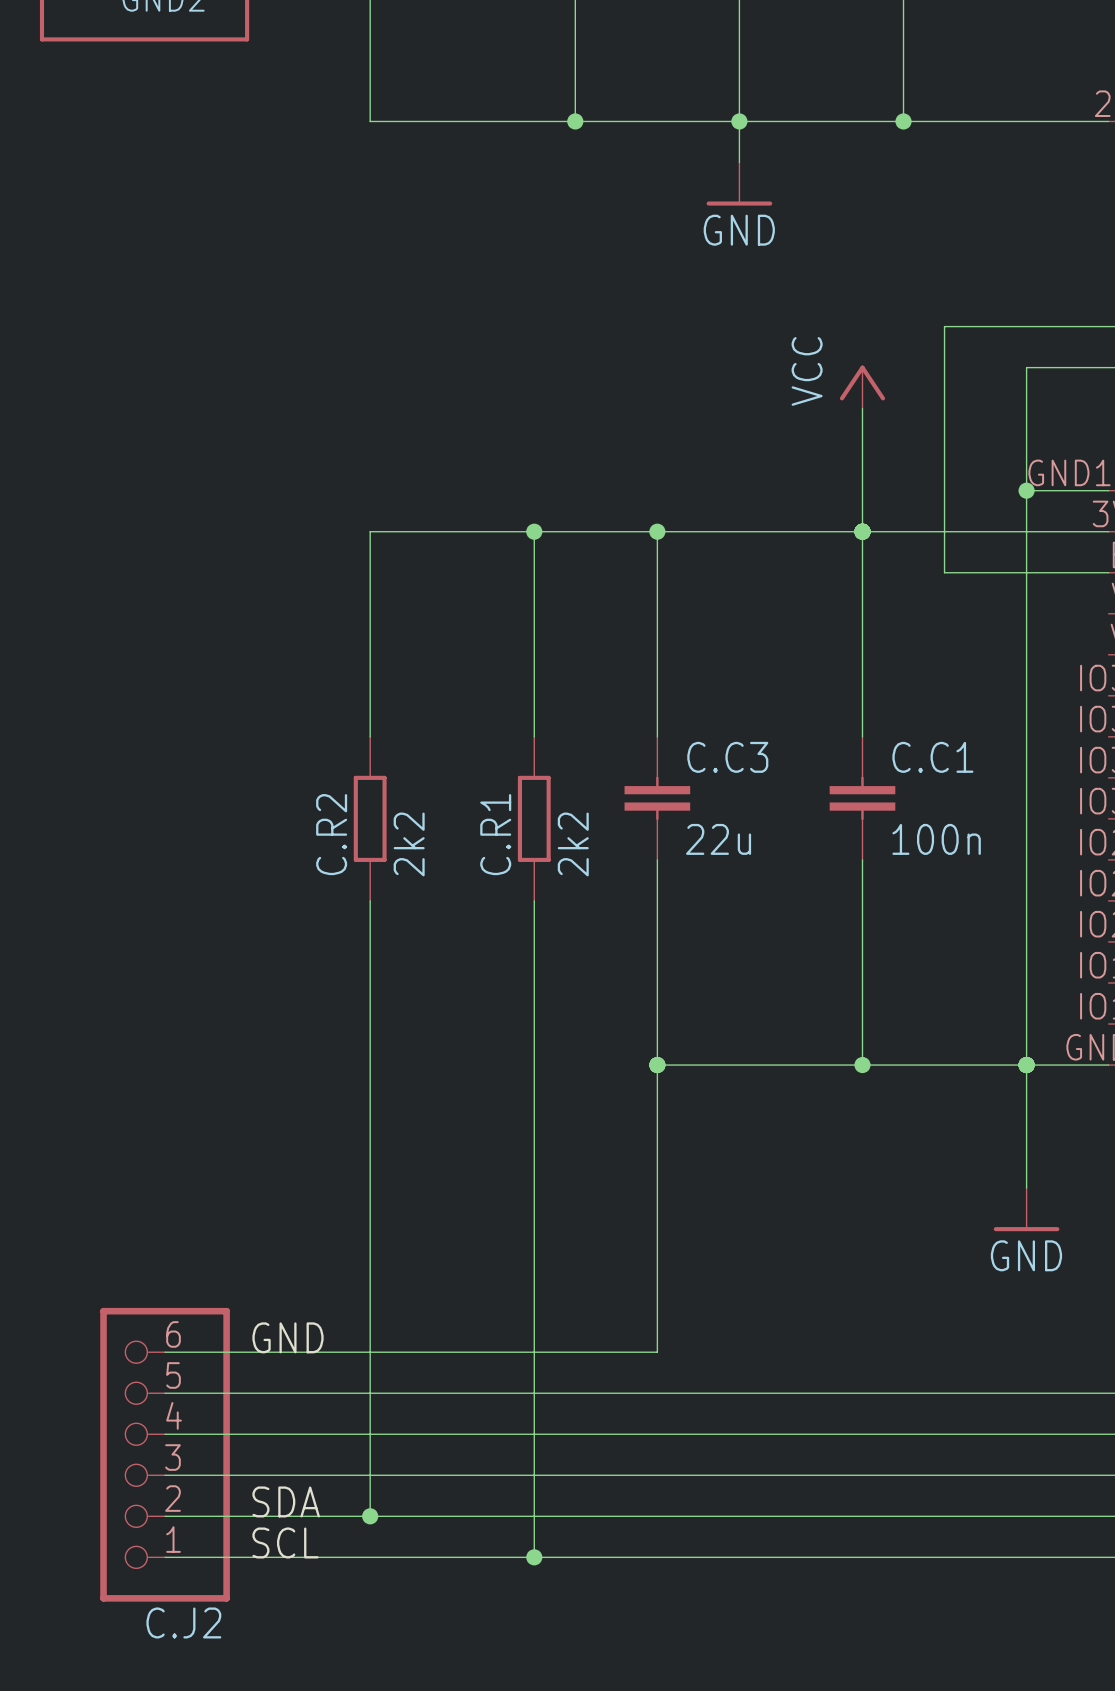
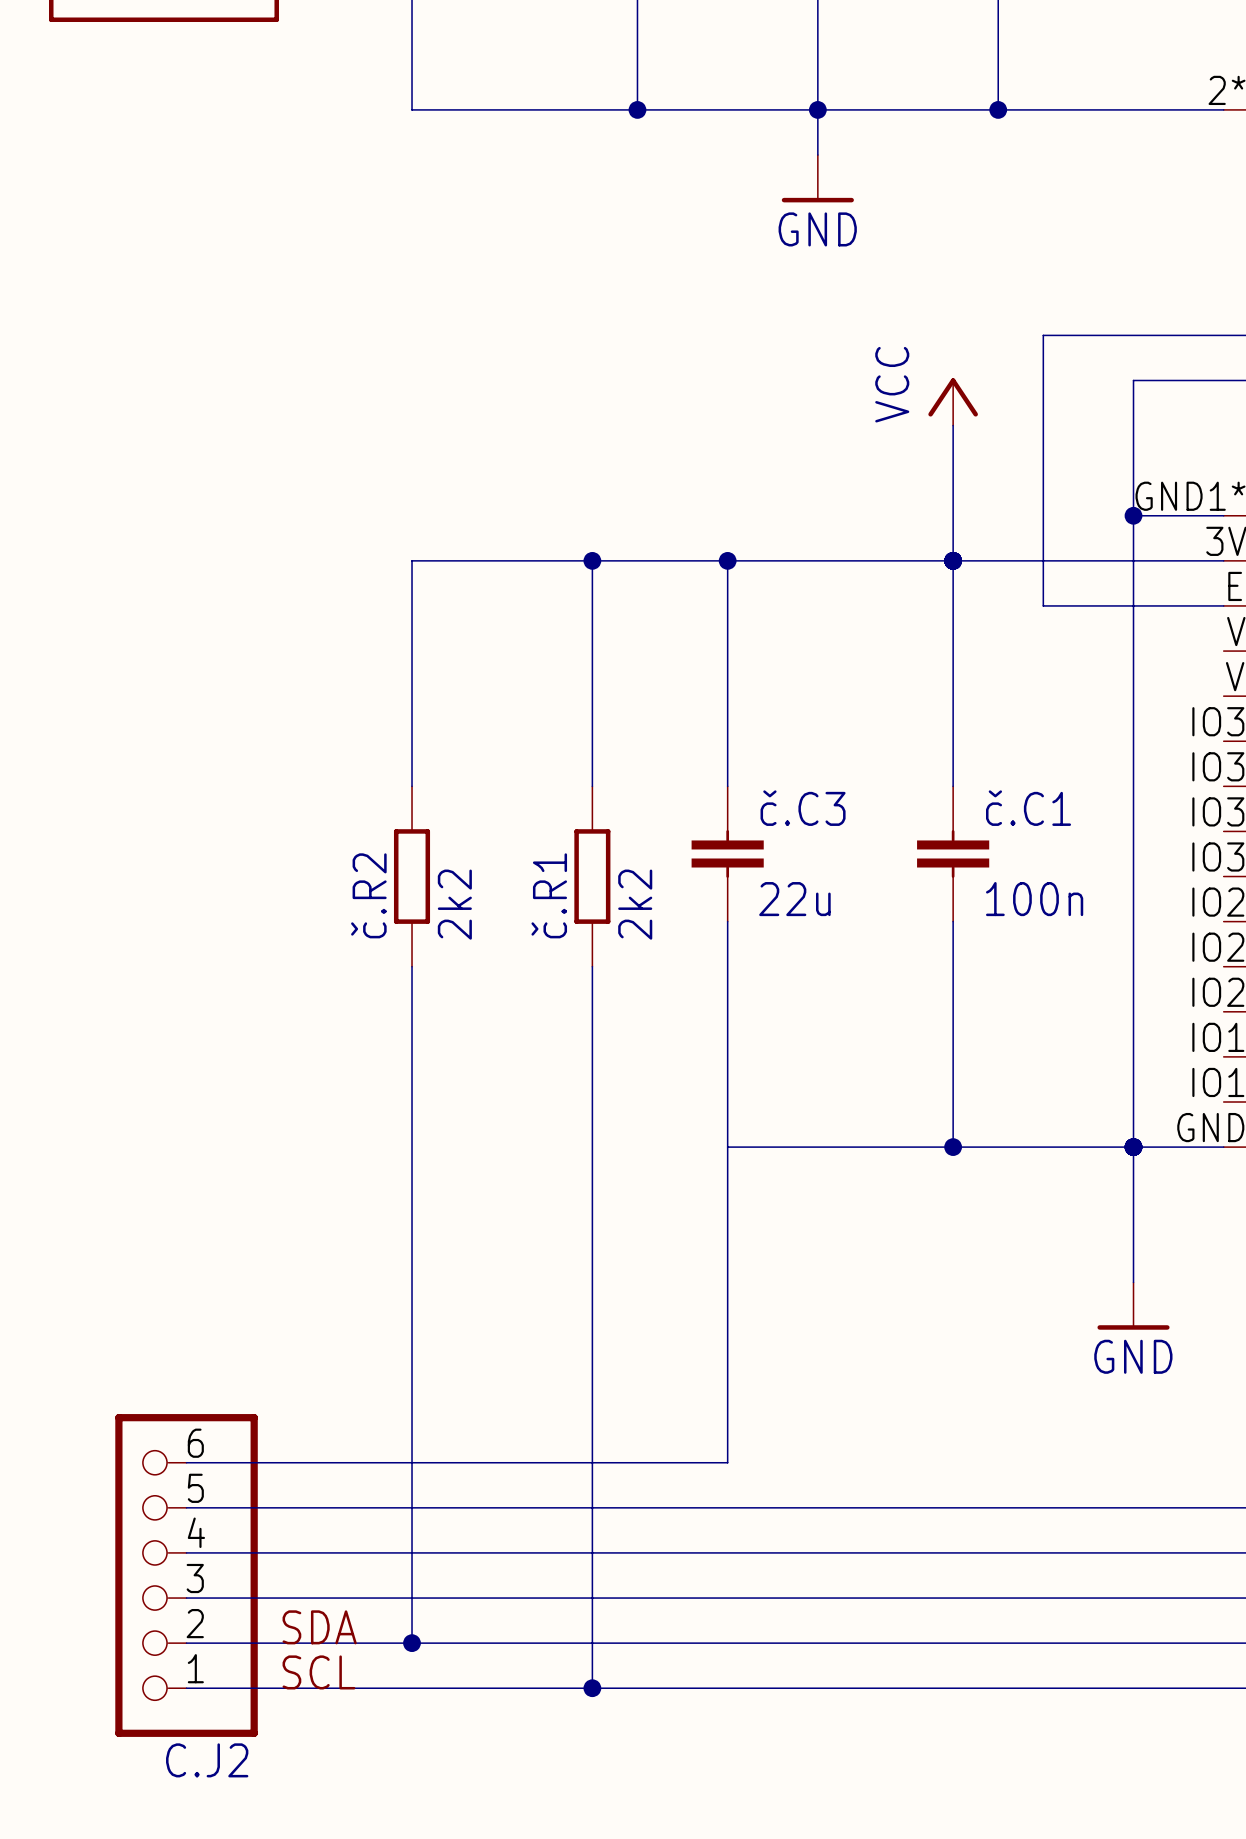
C.C3 name: C.C3 (727, 757) -> č.C3 (803, 808)
C.C1 name: C.C1 (932, 757) -> č.C1 (1028, 808)
C.R2 name: C.R2 (331, 834) -> č.R2 (368, 895)
C.R1 name: C.R1 (495, 834) -> č.R1 (549, 895)
junction: (657, 1065) -> none
label: GND (288, 1337) -> none

